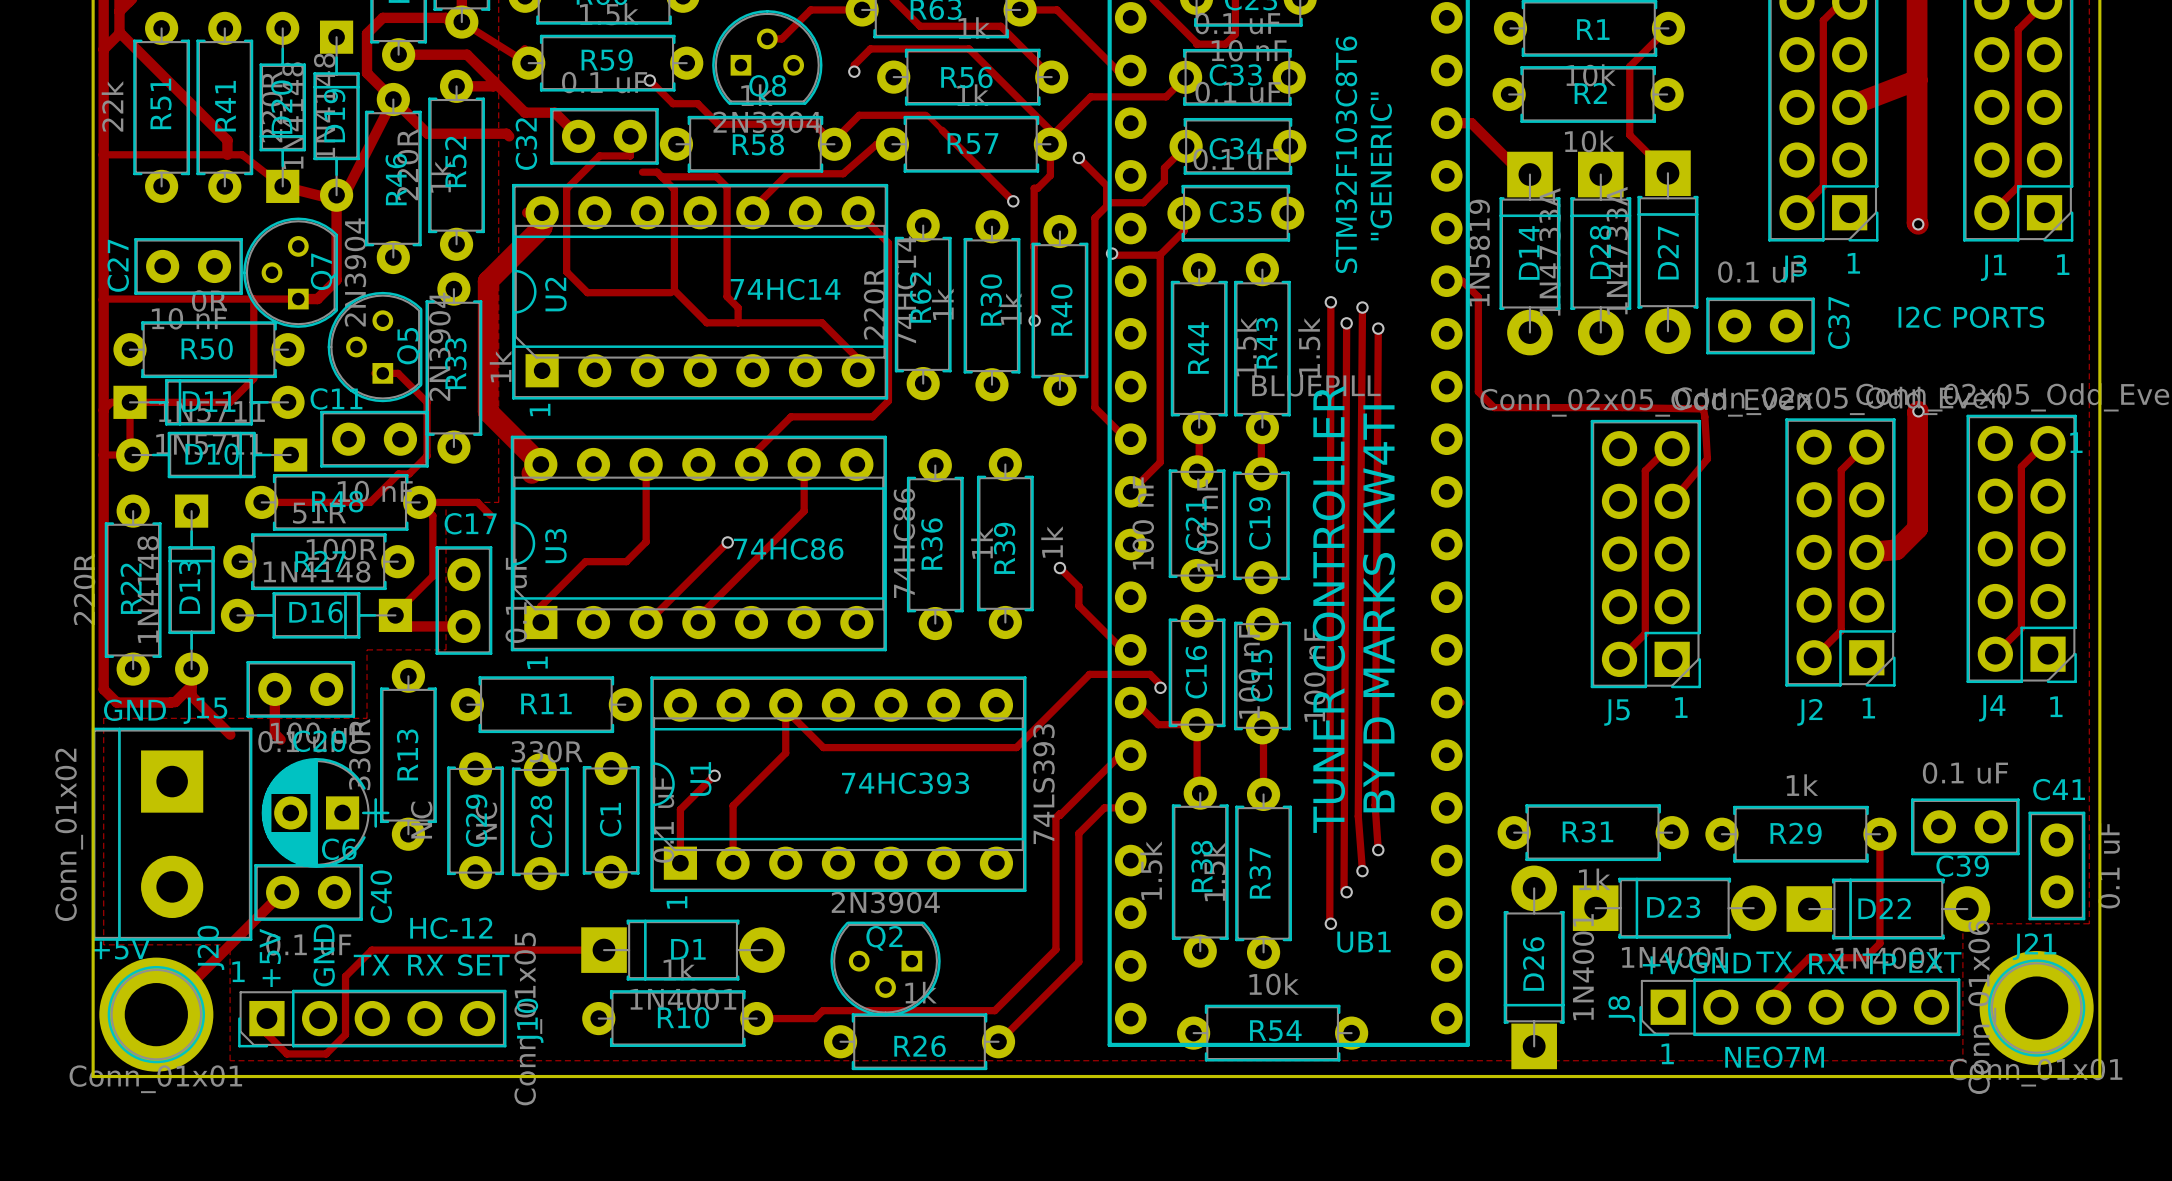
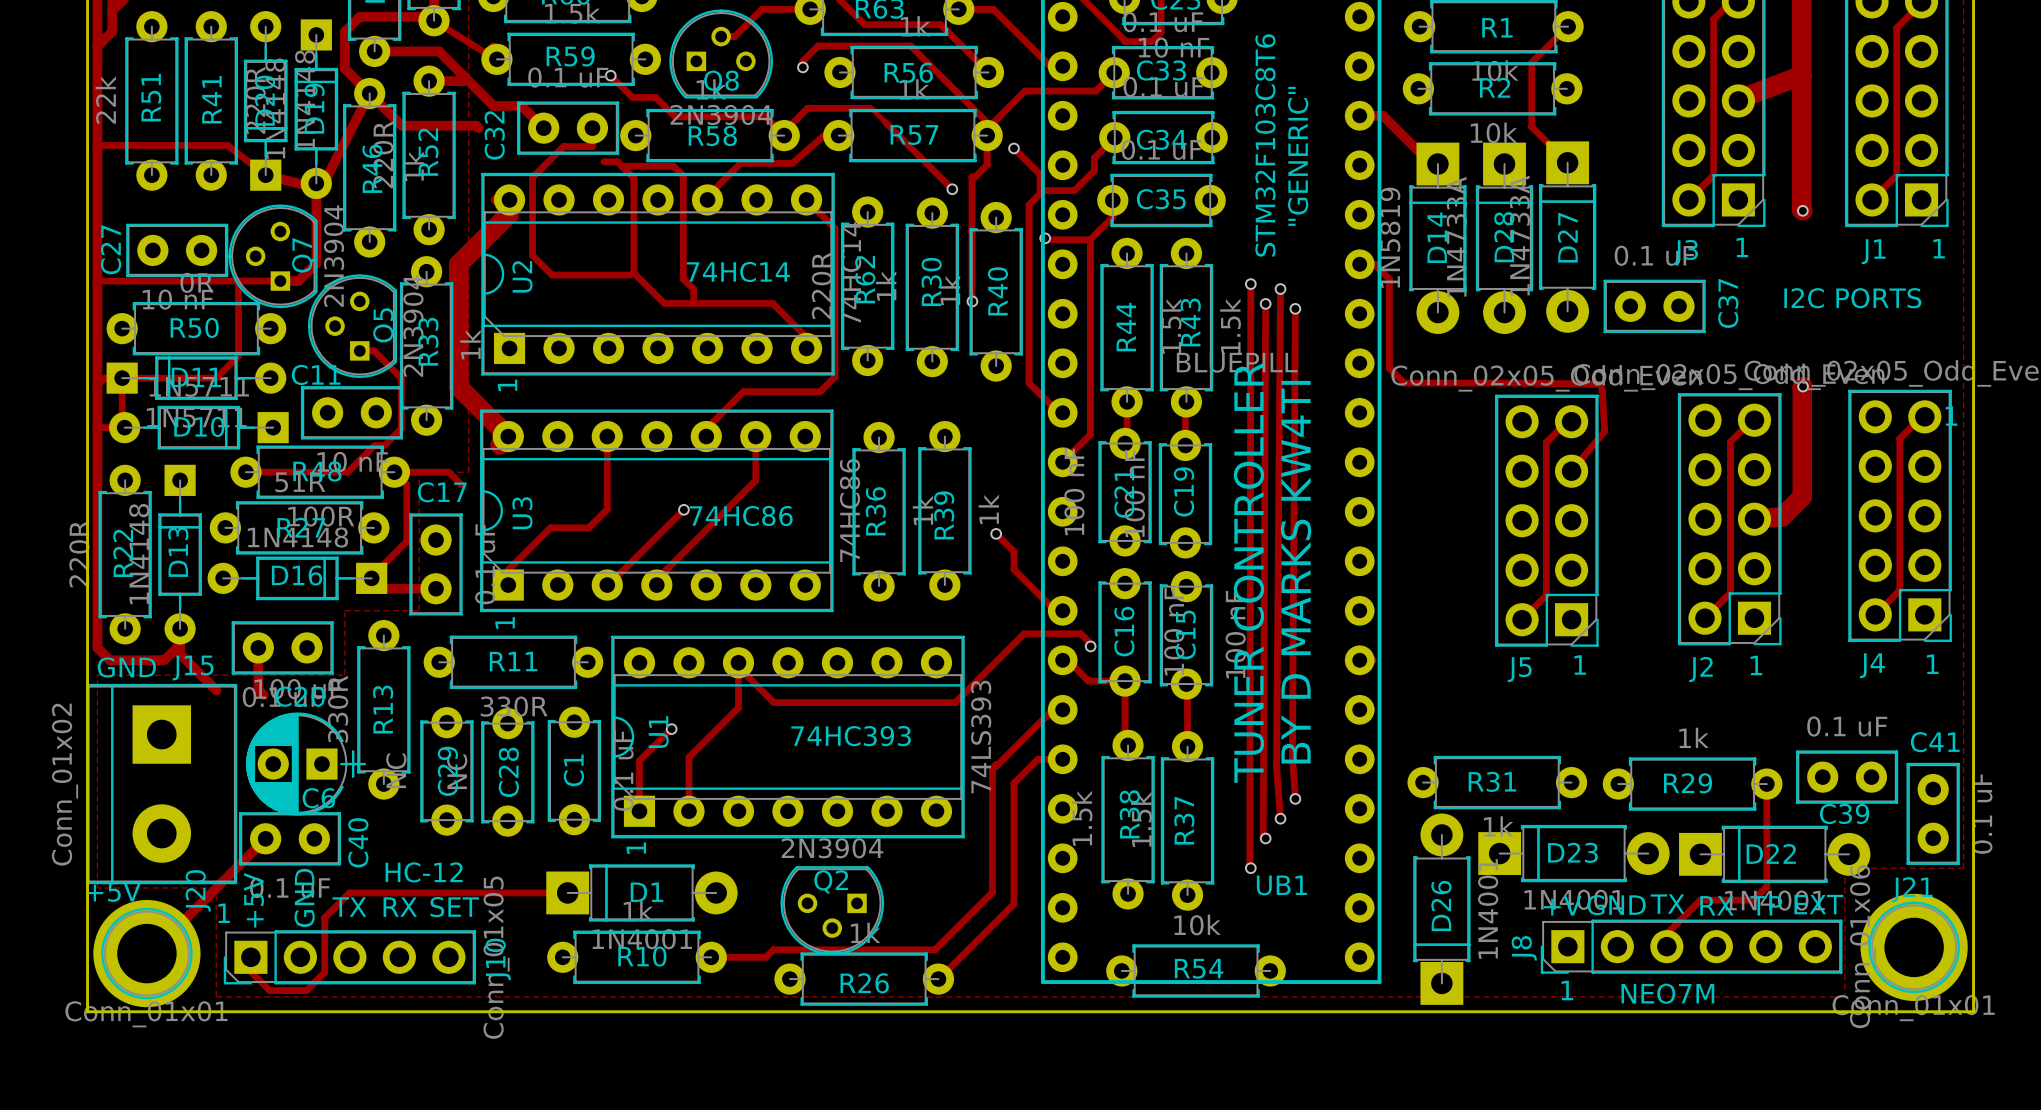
track: (119, 33) (227, 140) (227, 154) -> none

